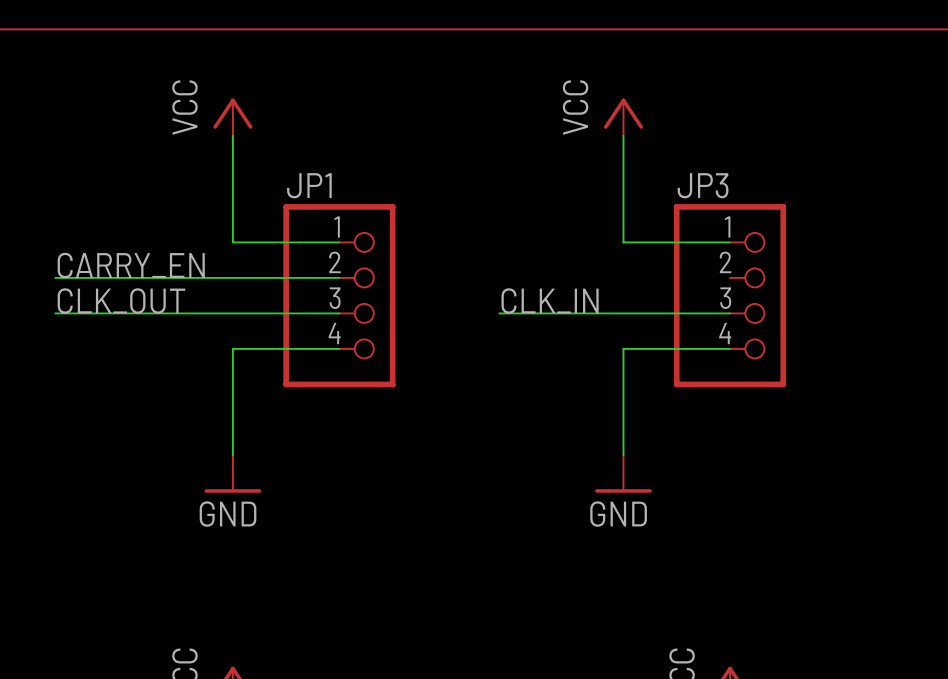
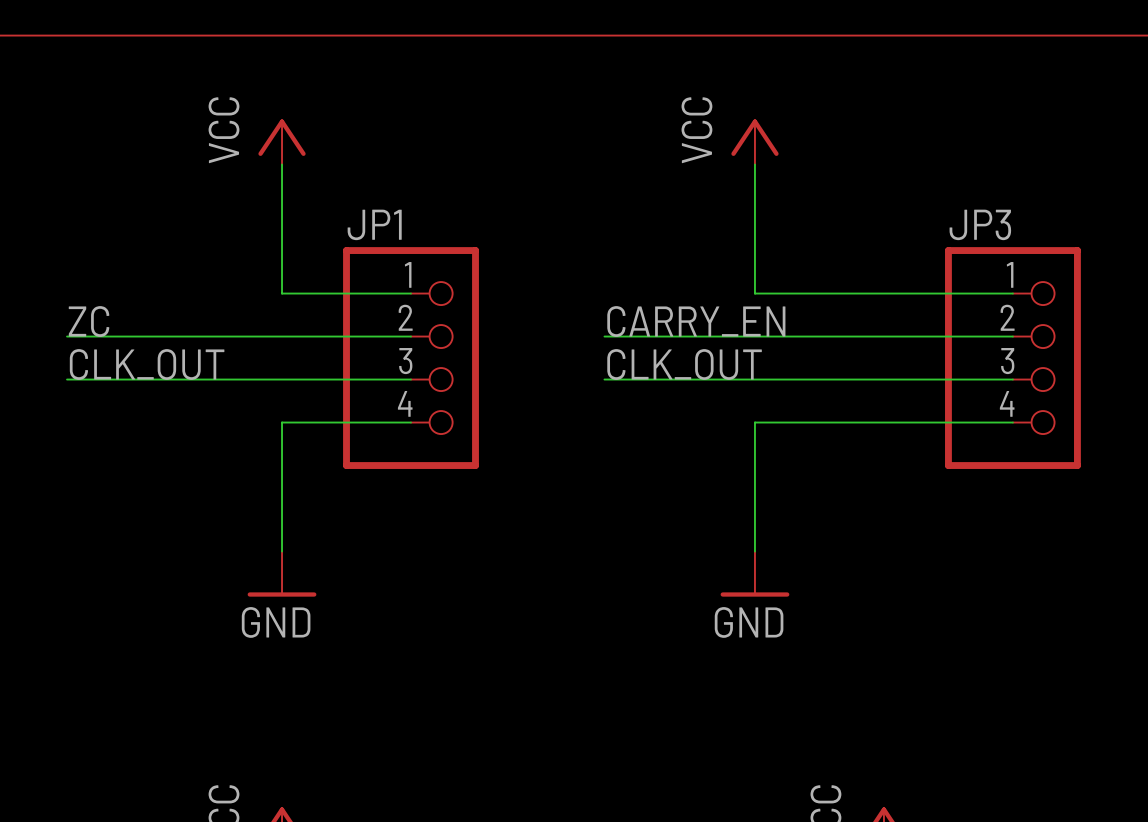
wire: none -> (883, 293) (1012, 293)
label: CARRY_EN (131, 265) -> ZC (89, 321)
label: none -> CARRY_EN (696, 321)
wire: none -> (604, 336) (1012, 336)
JP3 position: (730, 295) -> (1012, 358)
label: CLK_IN (550, 301) -> CLK_OUT (684, 364)
wire: none -> (883, 379) (1012, 379)
wire: none -> (883, 422) (1012, 422)

